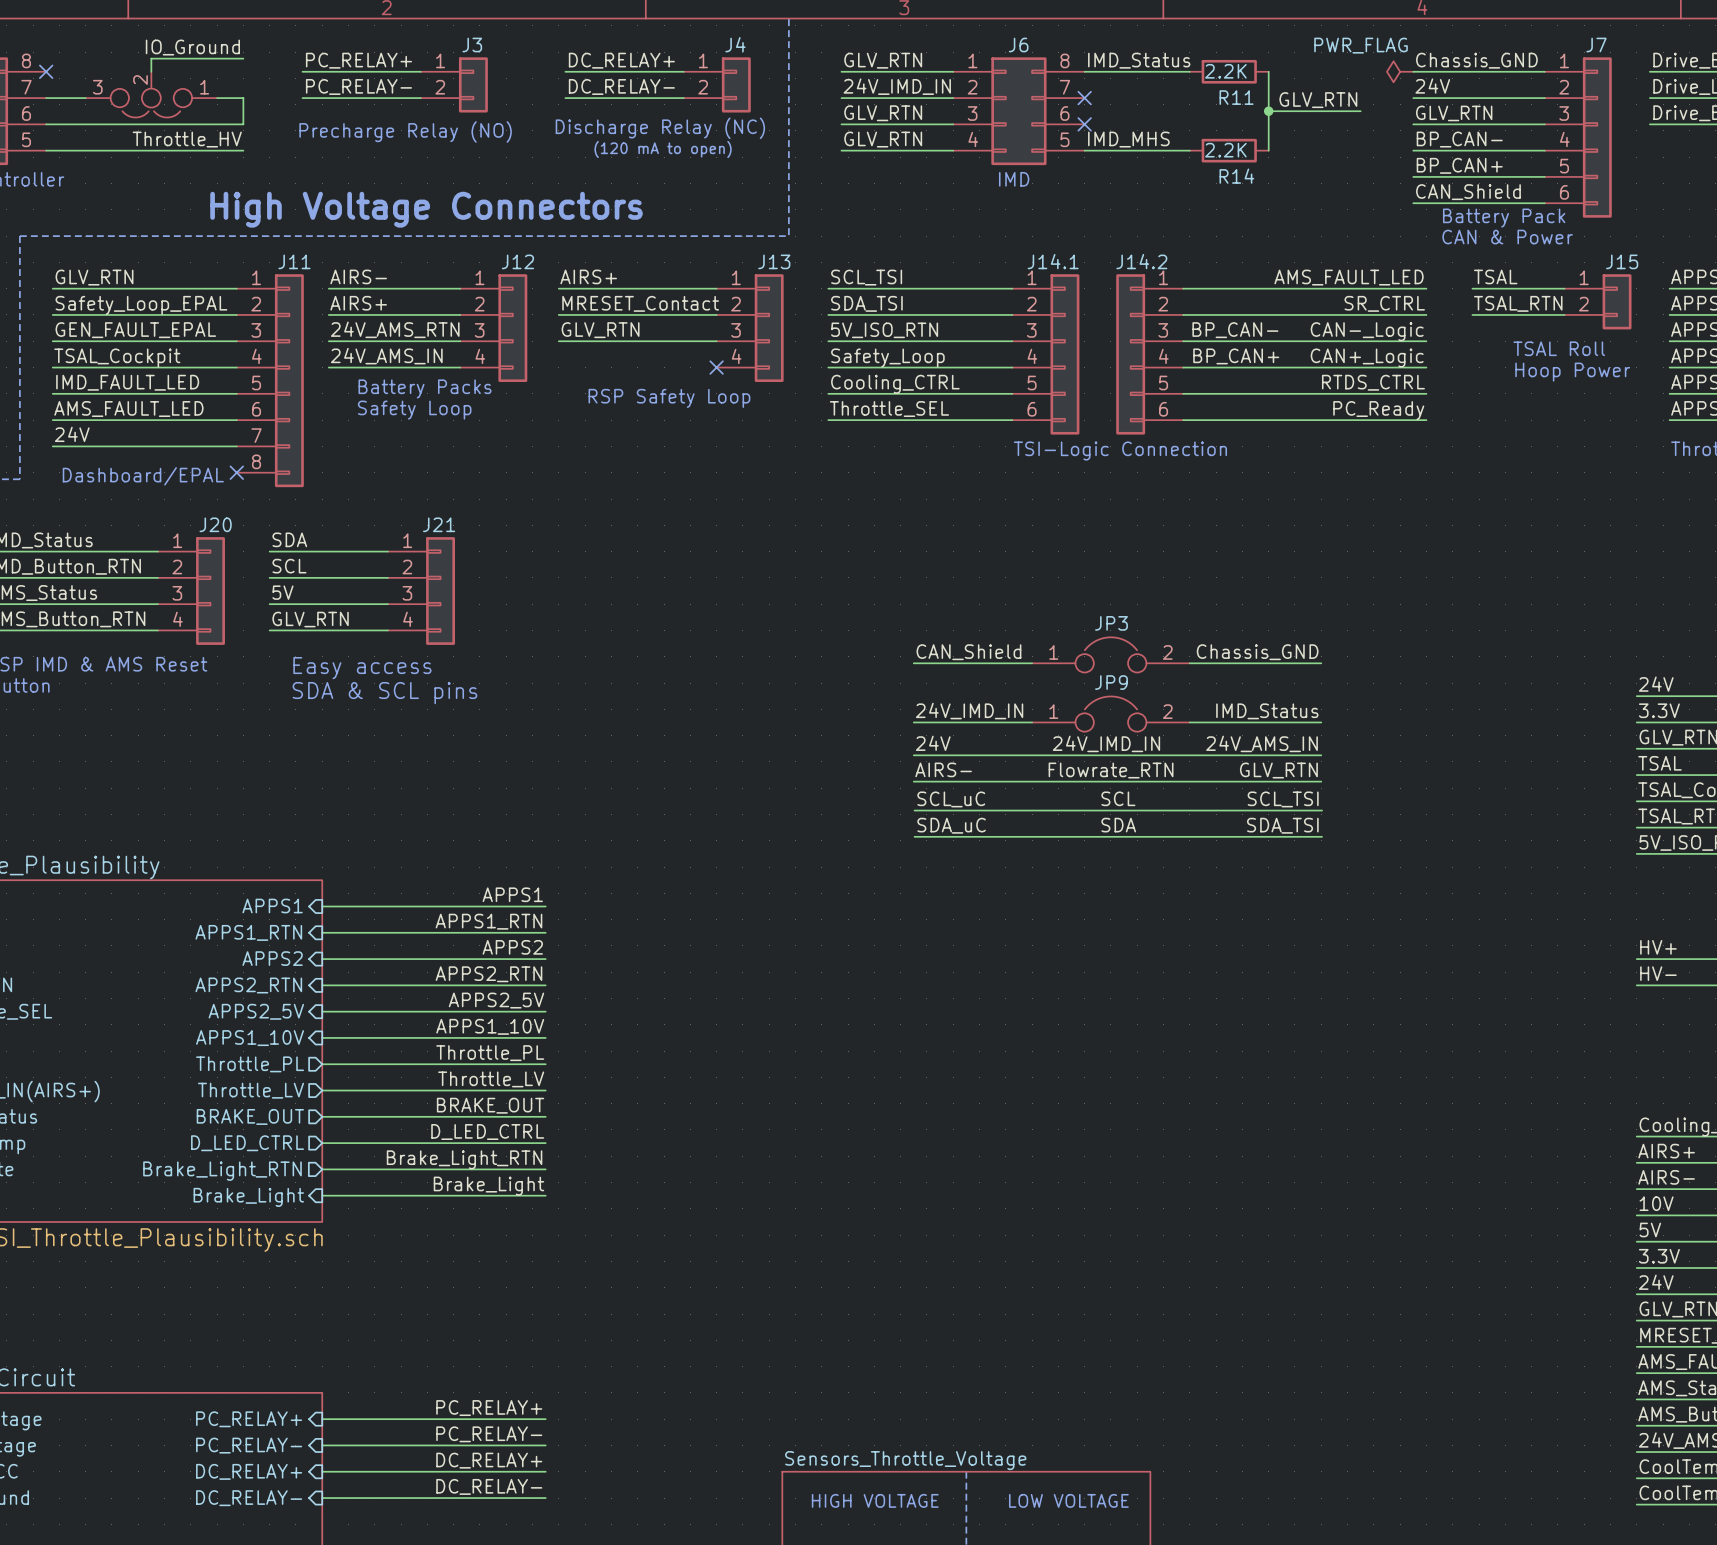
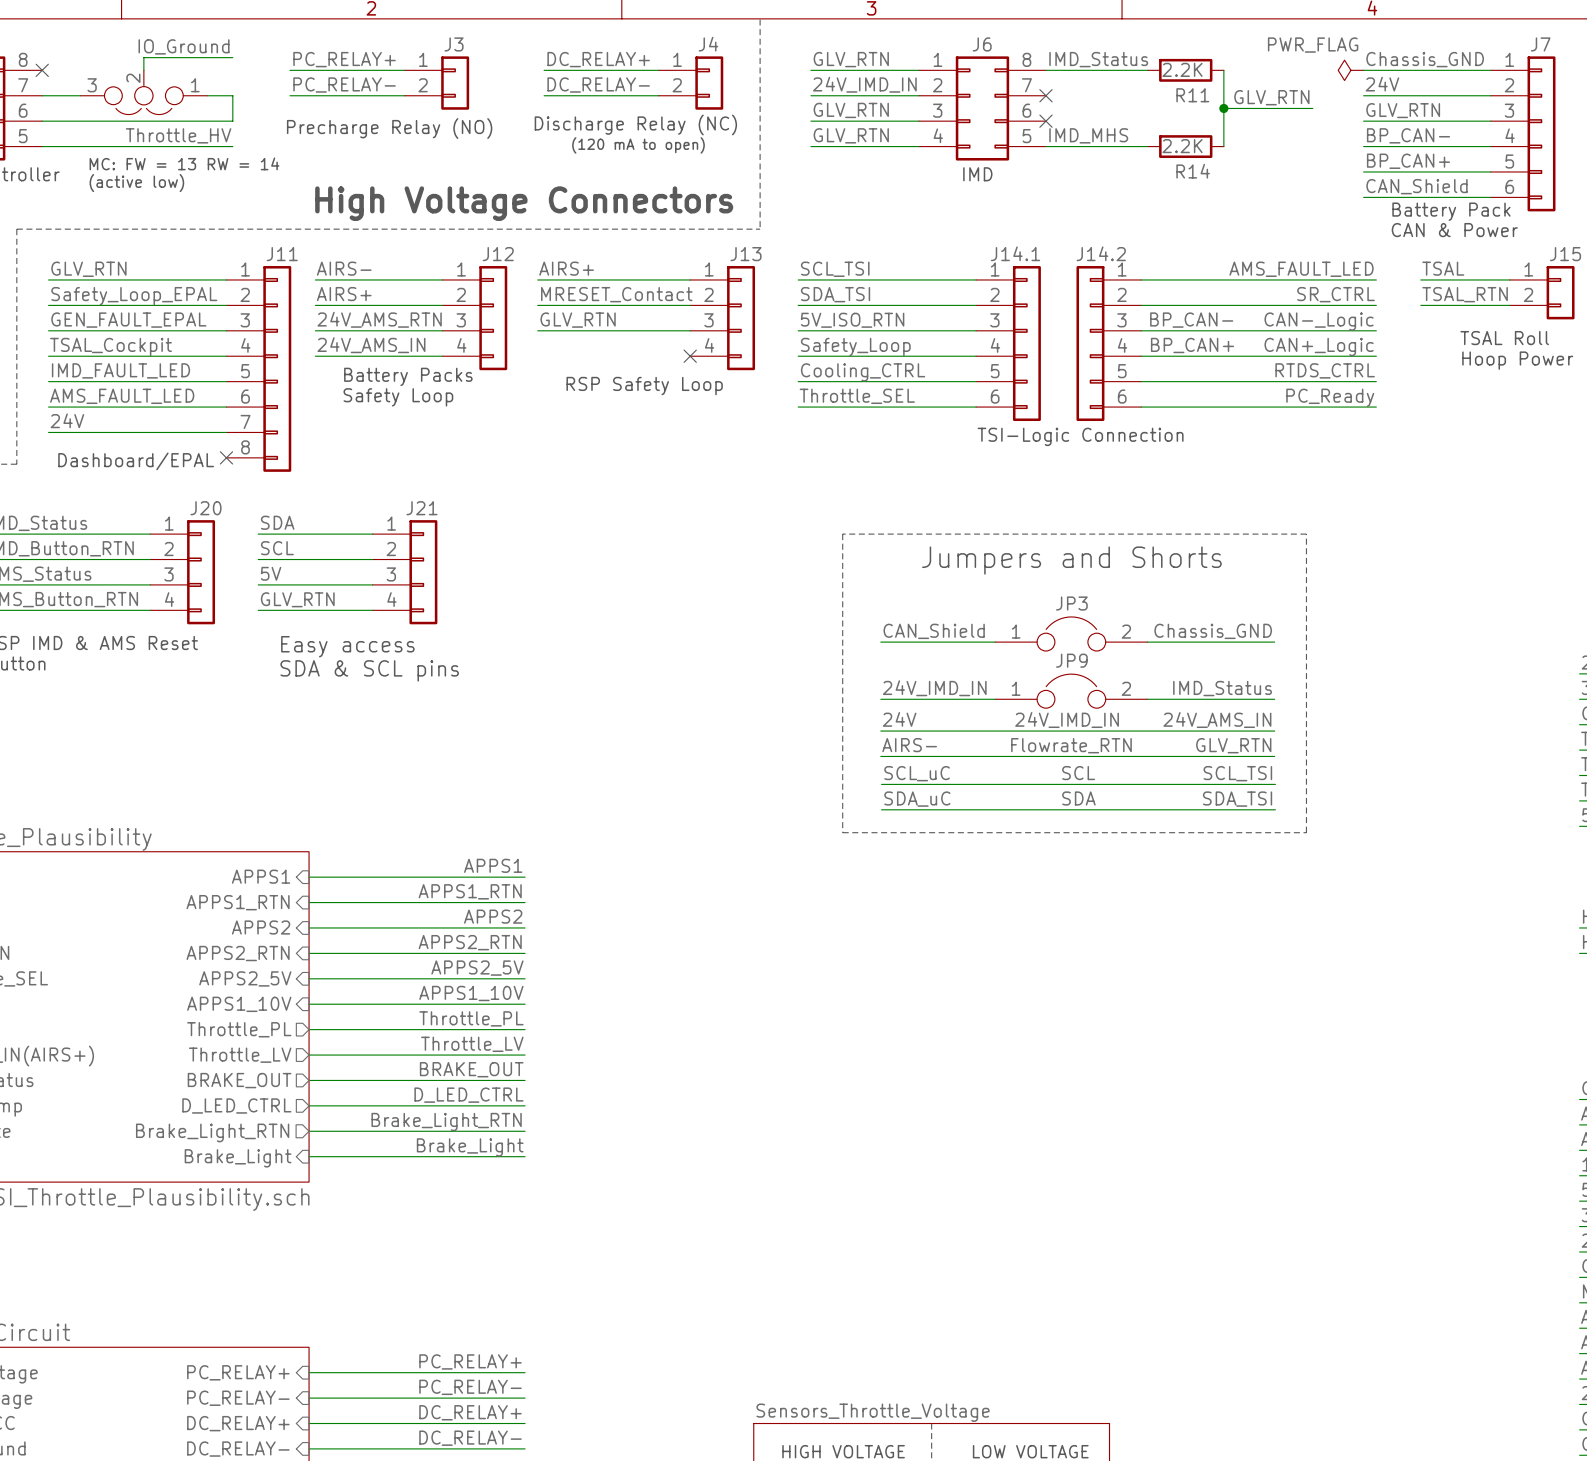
text: none -> MC: FW = 13 RW = 14 (184, 163)
text: none -> (active low) (136, 183)
text position: High Voltage Connectors (426, 209) -> High Voltage Connectors (524, 203)
line: none -> (842, 534) (1306, 534) (1306, 832) (842, 832) (842, 534)
text: none -> Jumpers and Shorts (1071, 560)

